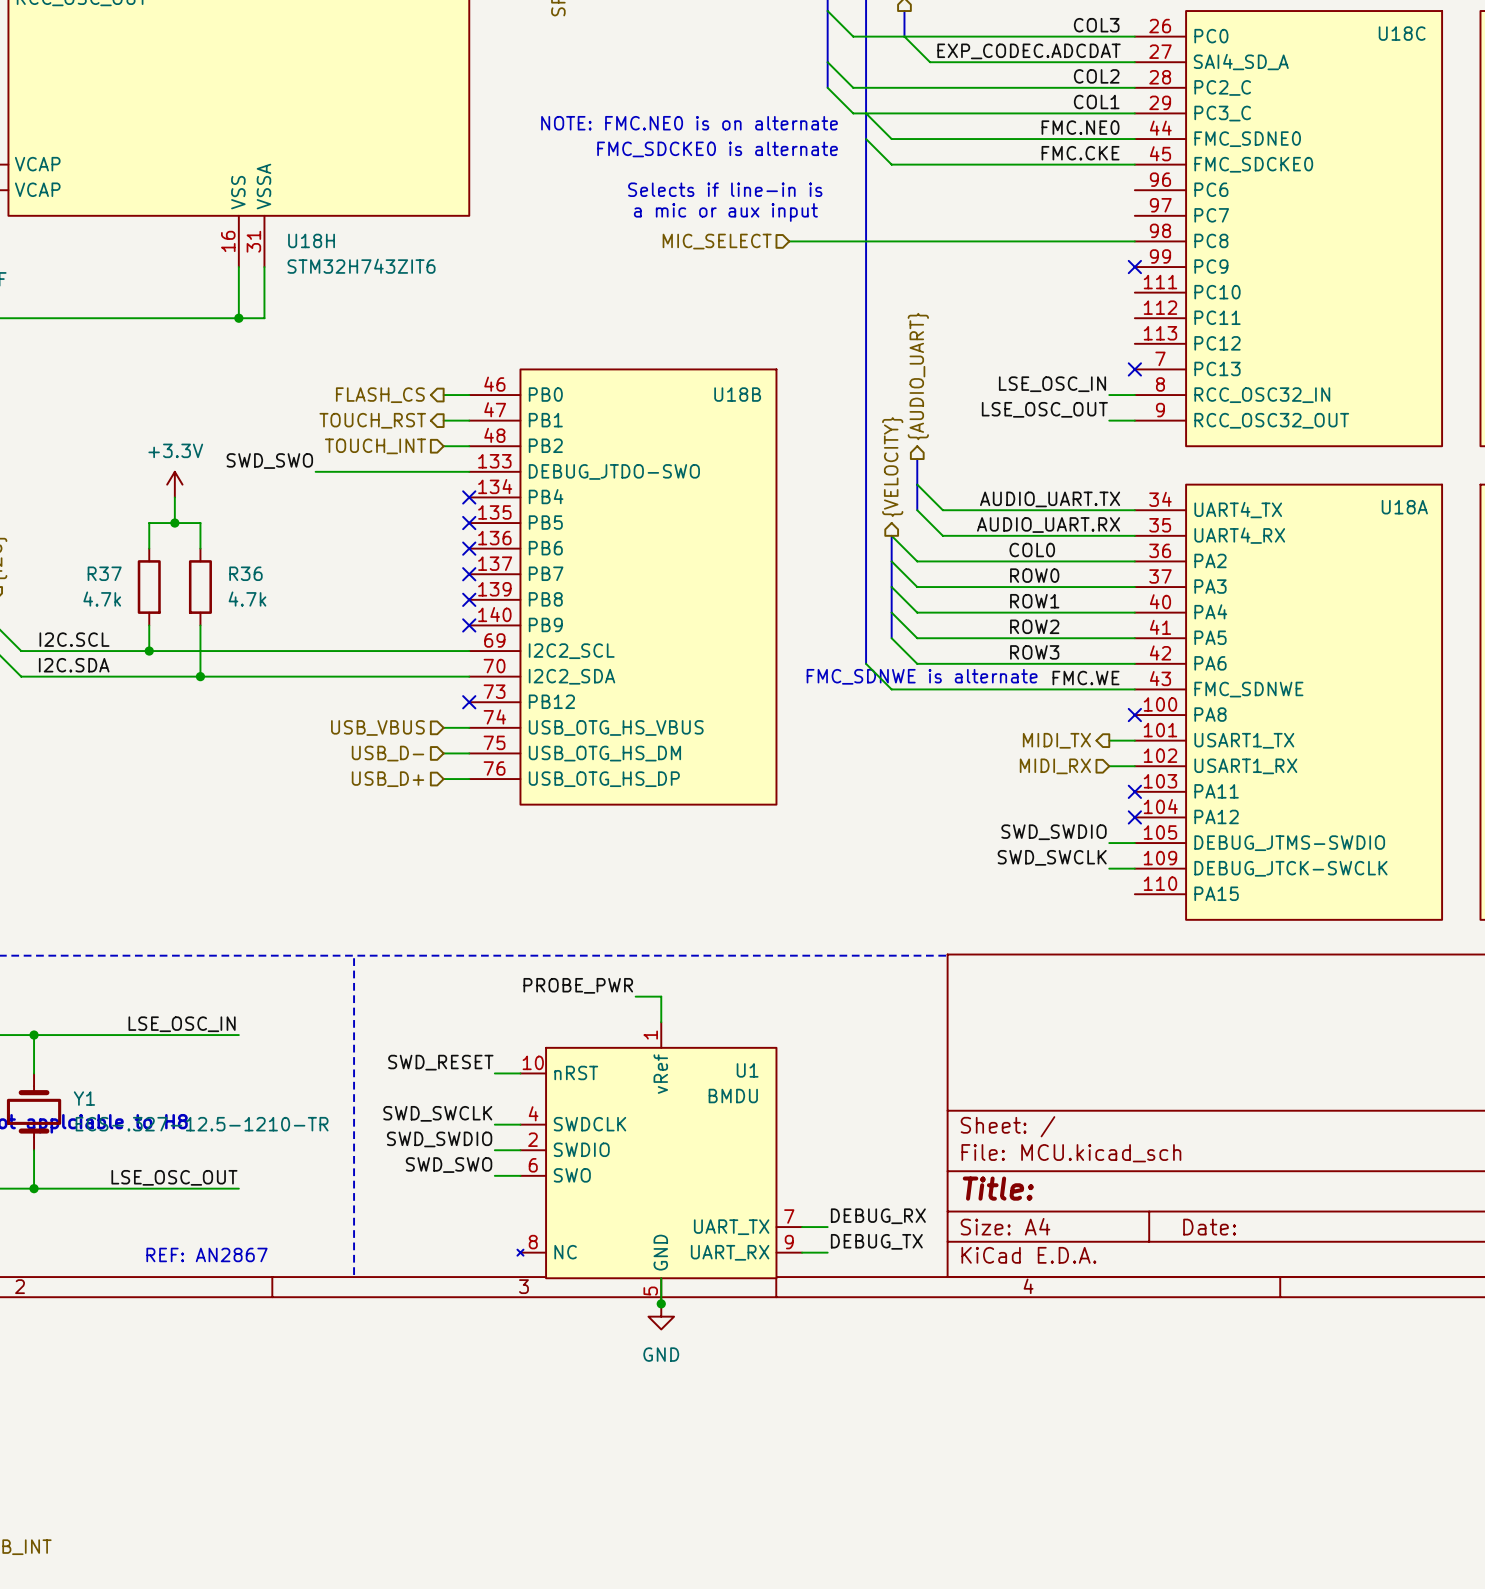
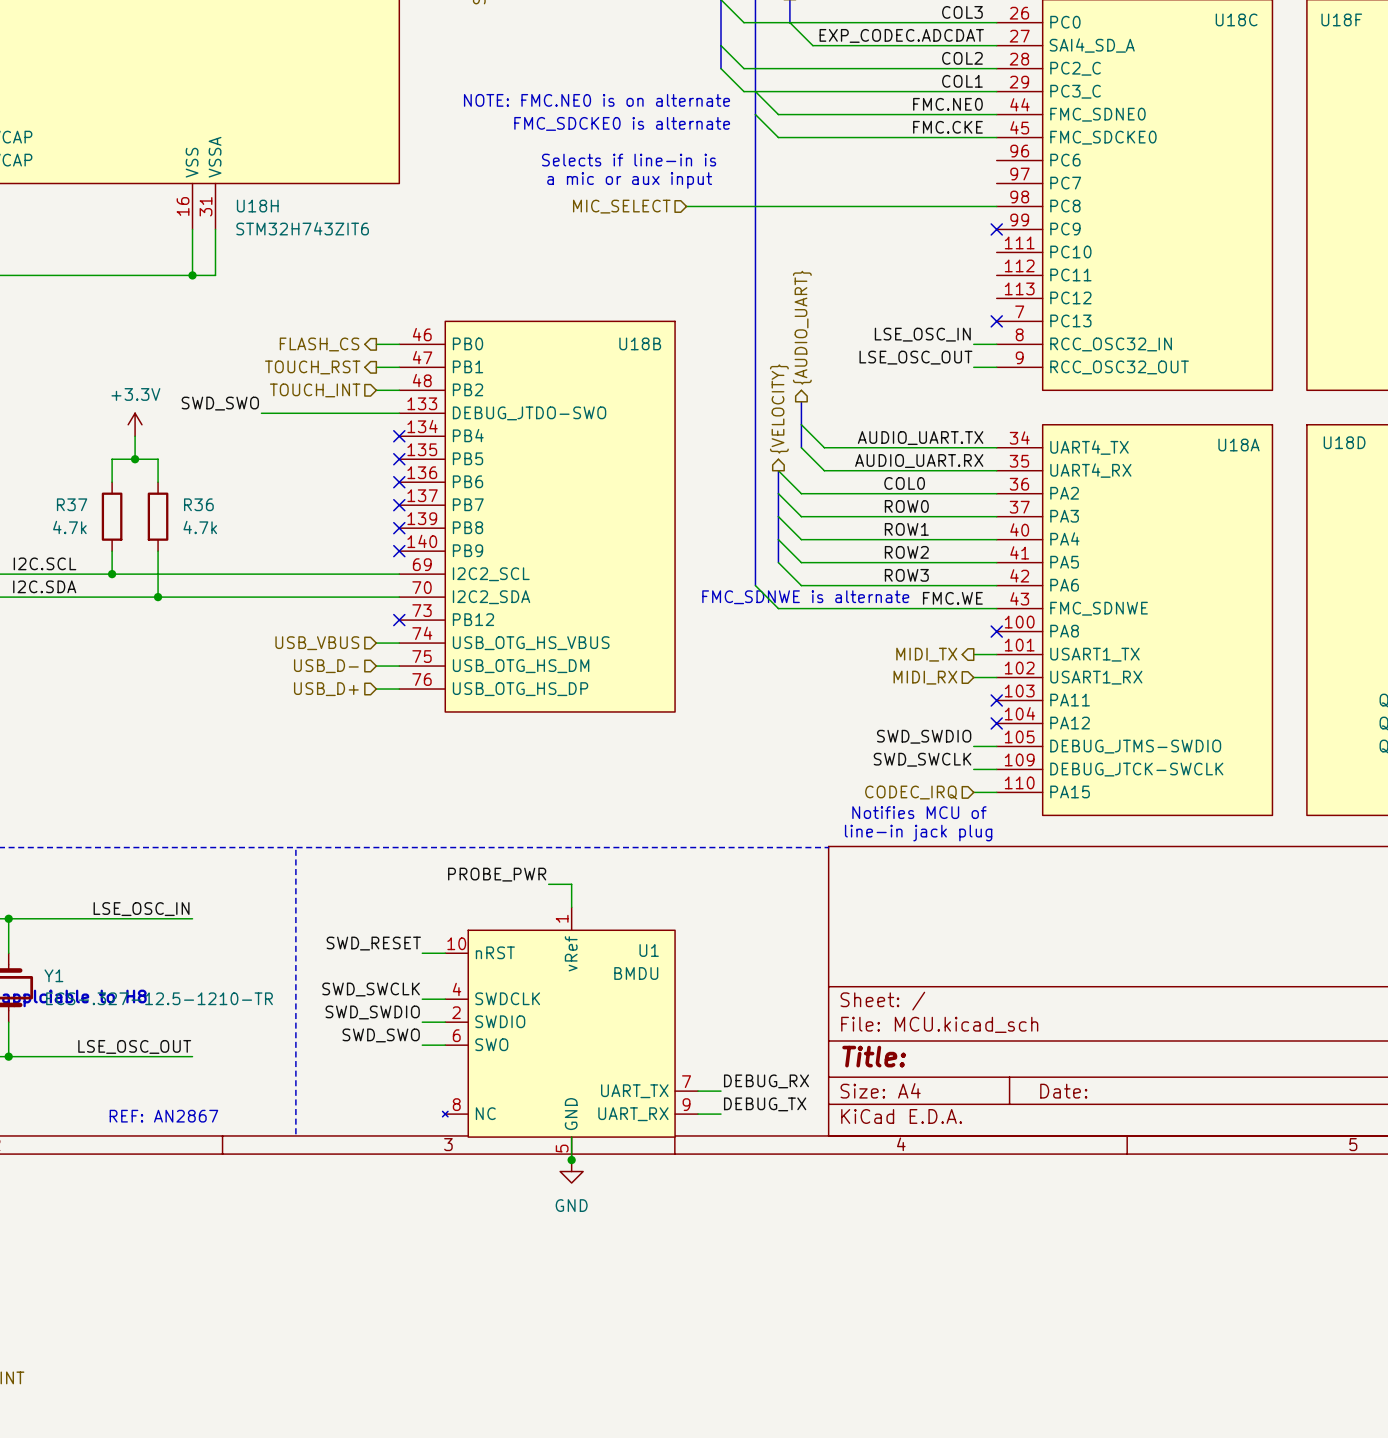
hierarchical label: none -> CODEC_IRQ (911, 792)
wire: none -> (973, 792) (996, 792)
text: none -> Notifies MCU of (919, 812)
text: none -> line-in jack plug (918, 833)

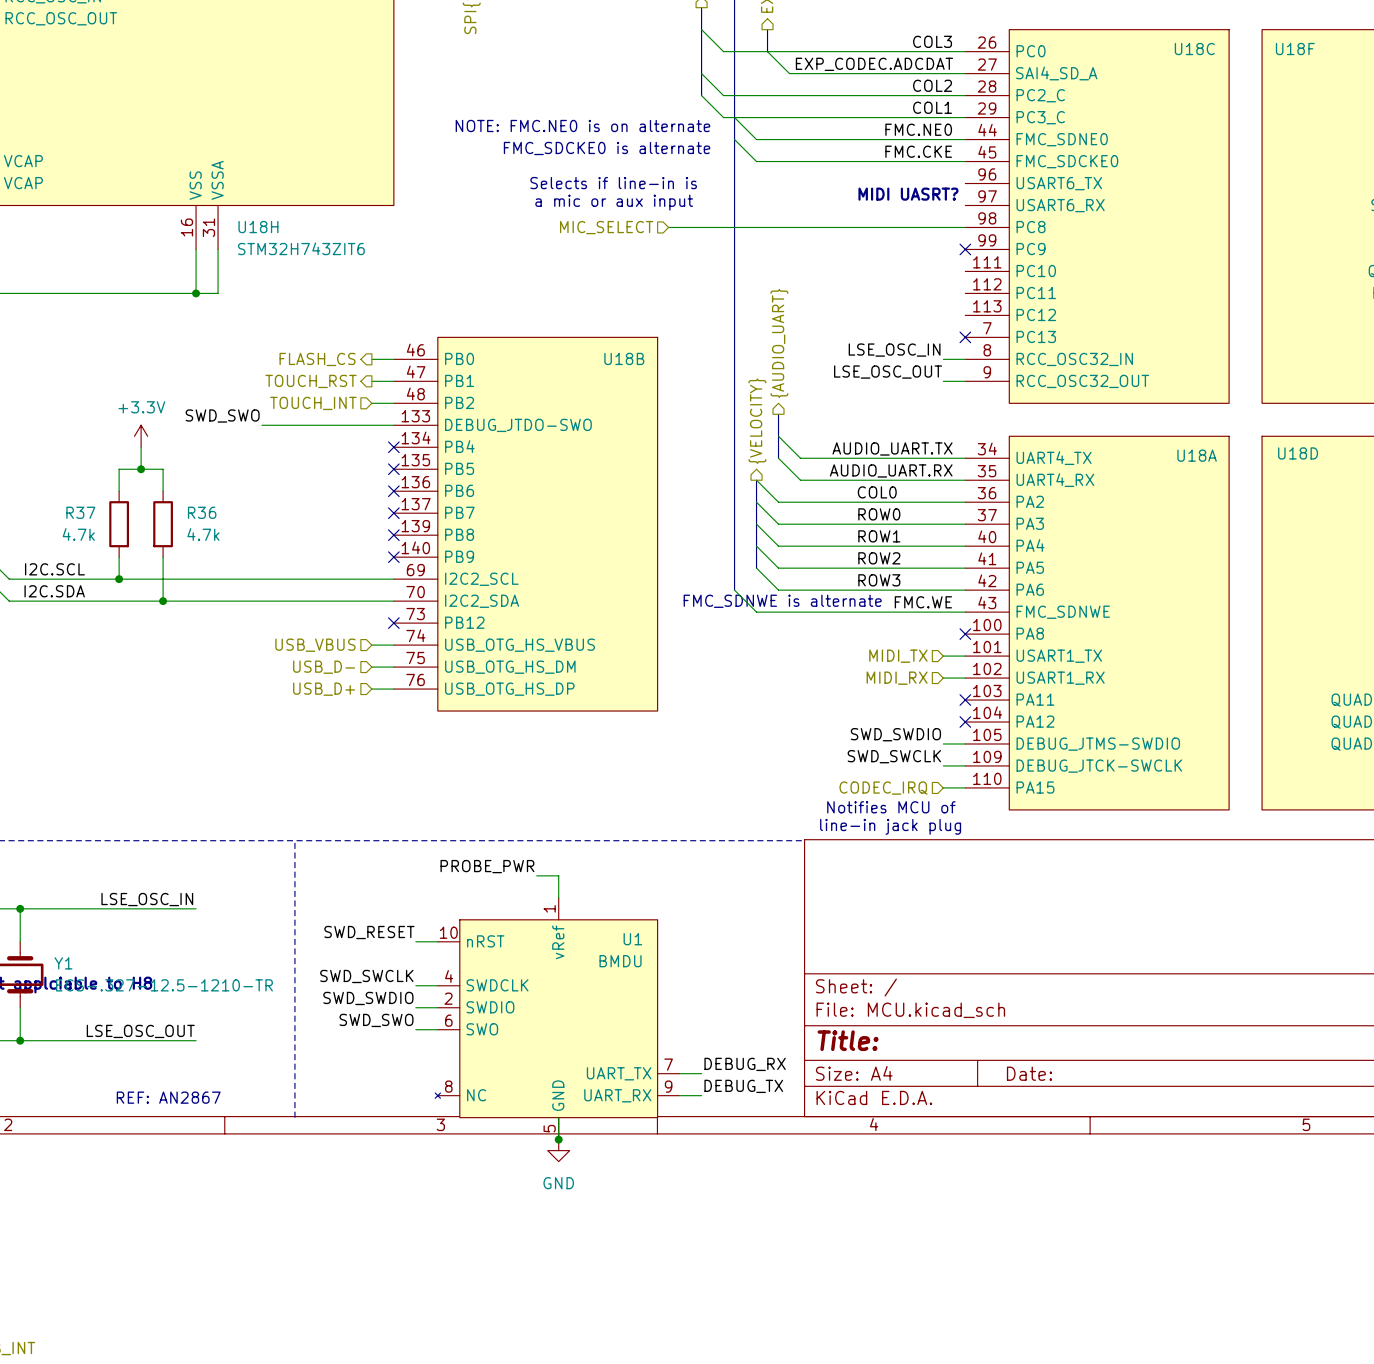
U18C pin name: PC6 (1065, 160) -> USART6_TX (1059, 183)
text: none -> MIDI UASRT? (908, 194)
U18C pin name: PC7 (1065, 183) -> USART6_RX (1060, 205)
hierarchical label shape: output (926, 654) -> input (898, 656)

